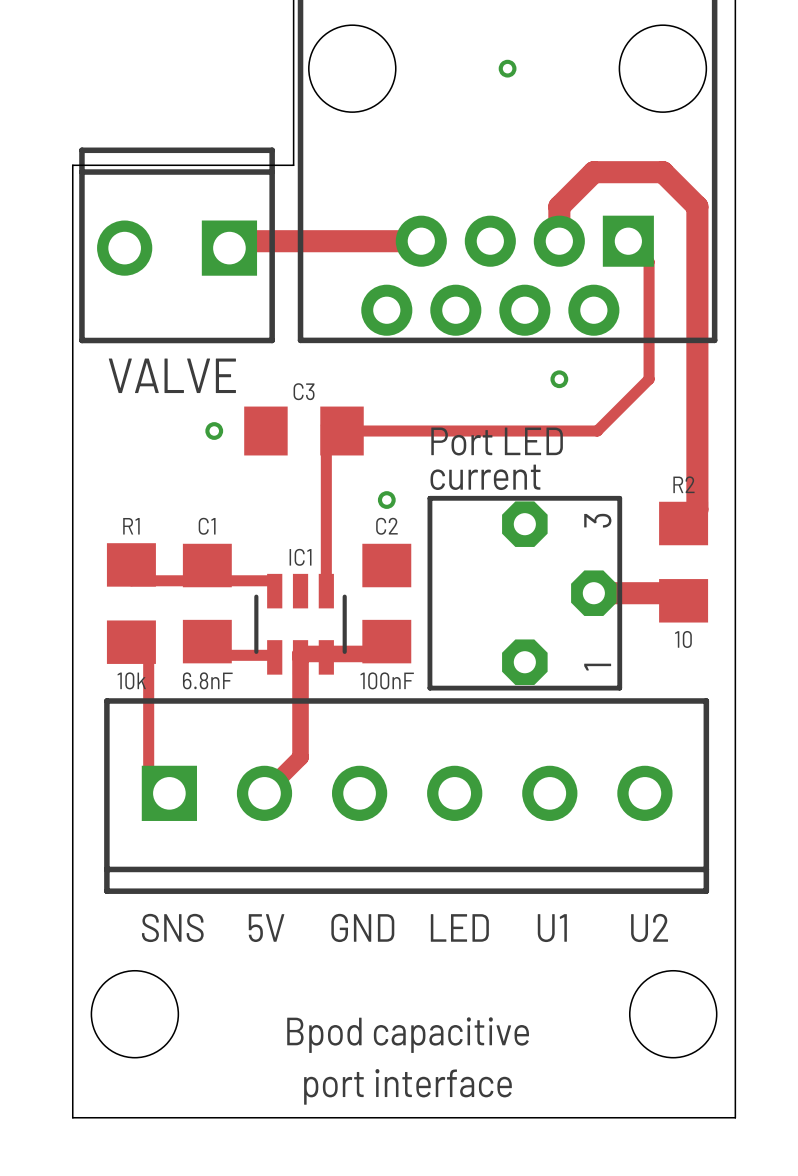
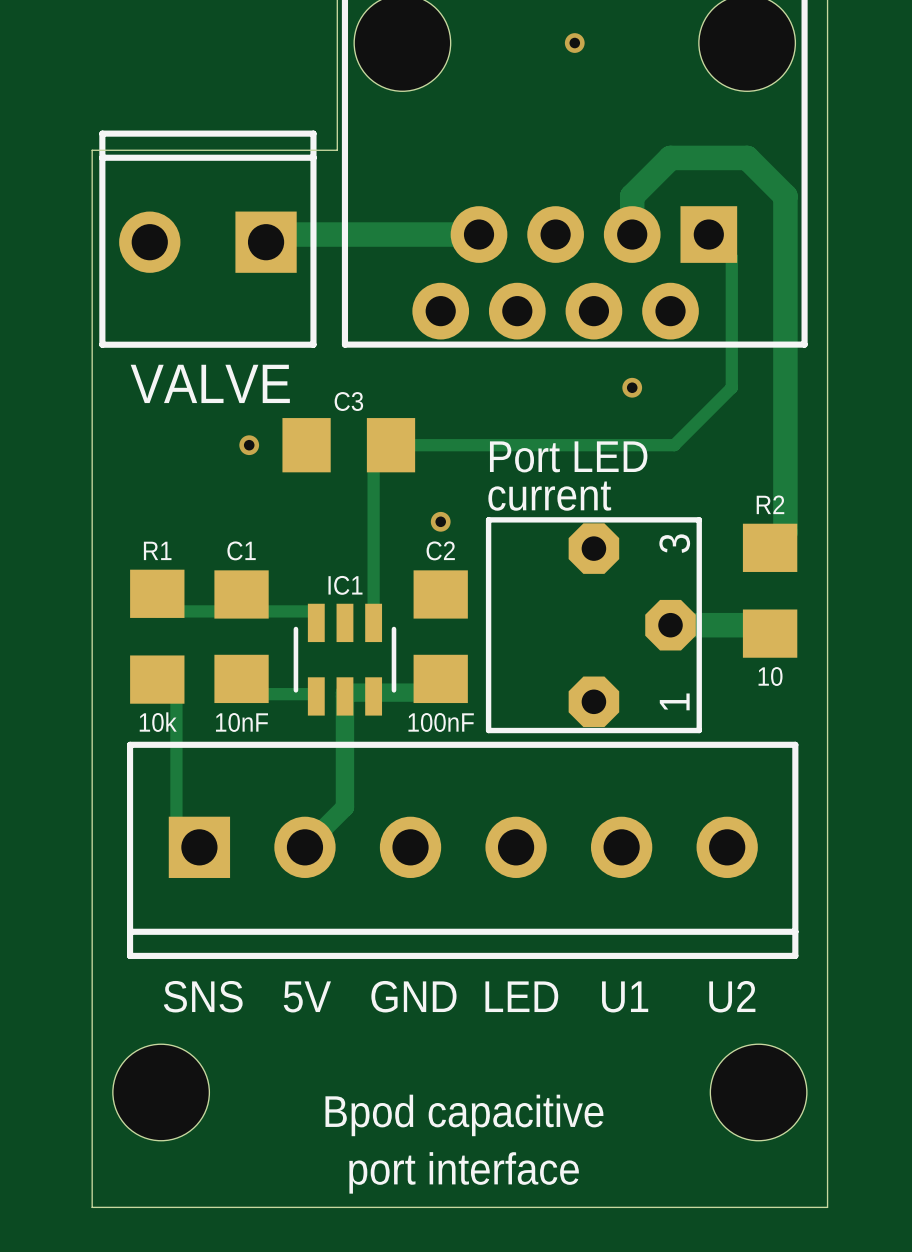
C1 value: 6.8nF (207, 680) -> 10nF (241, 722)

